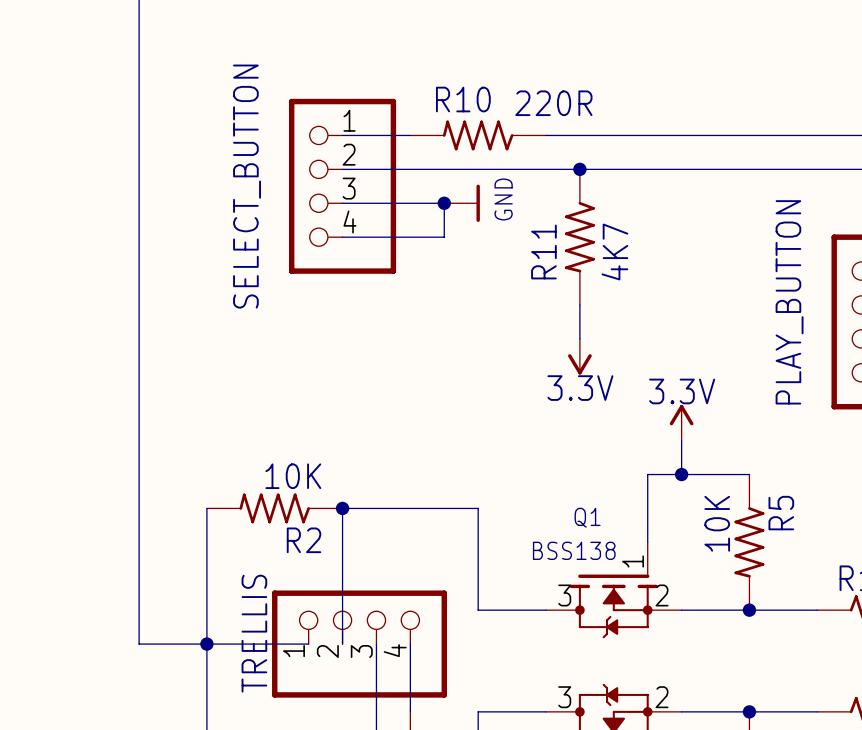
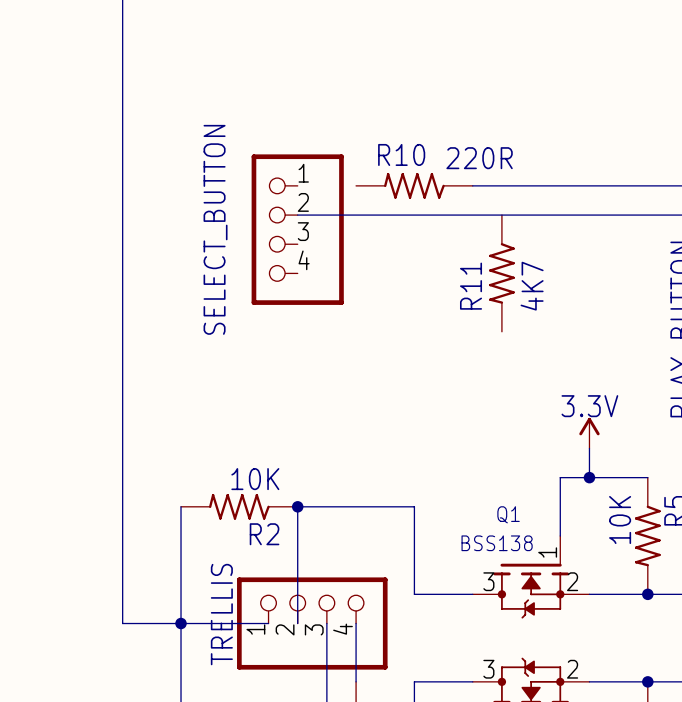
wire: (342, 135) (410, 135) -> none
junction: (579, 169) -> none
wire: (342, 203) (444, 203) (444, 237) (342, 237) -> none
junction: (444, 203) -> none
power symbol: GND (462, 203) -> none
wire: (579, 304) (579, 338) -> none
power symbol: 3.3V (579, 356) -> none

